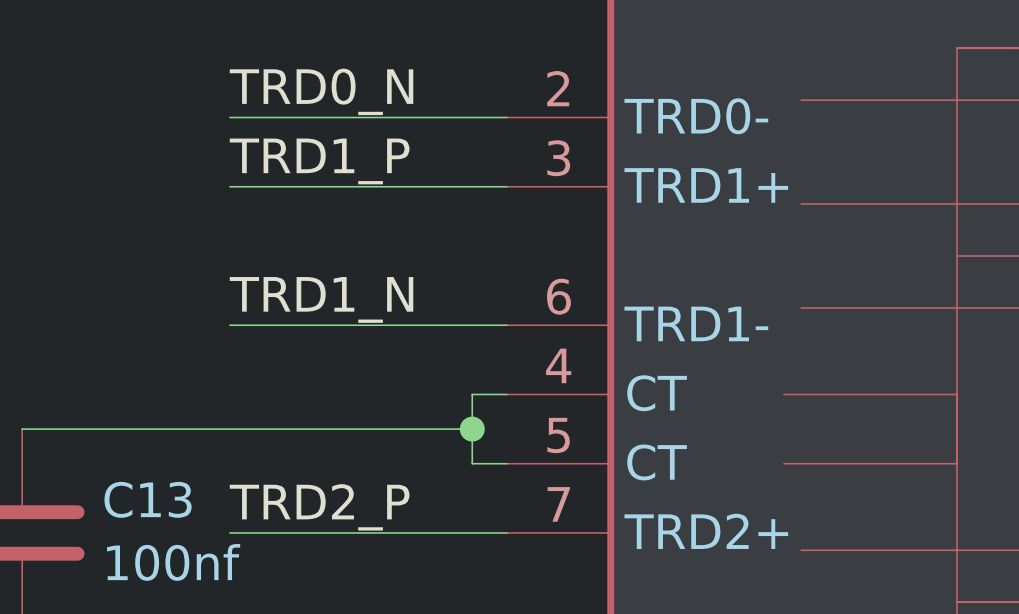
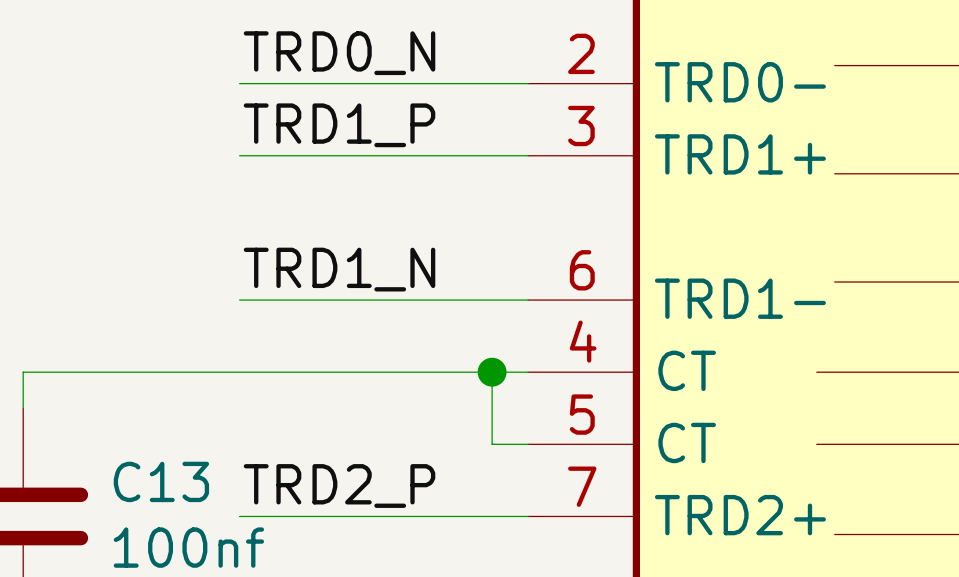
junction: none -> (492, 372)
wire: (22, 429) (472, 429) -> (23, 408) (23, 372) (492, 372)
junction: (472, 429) -> none

